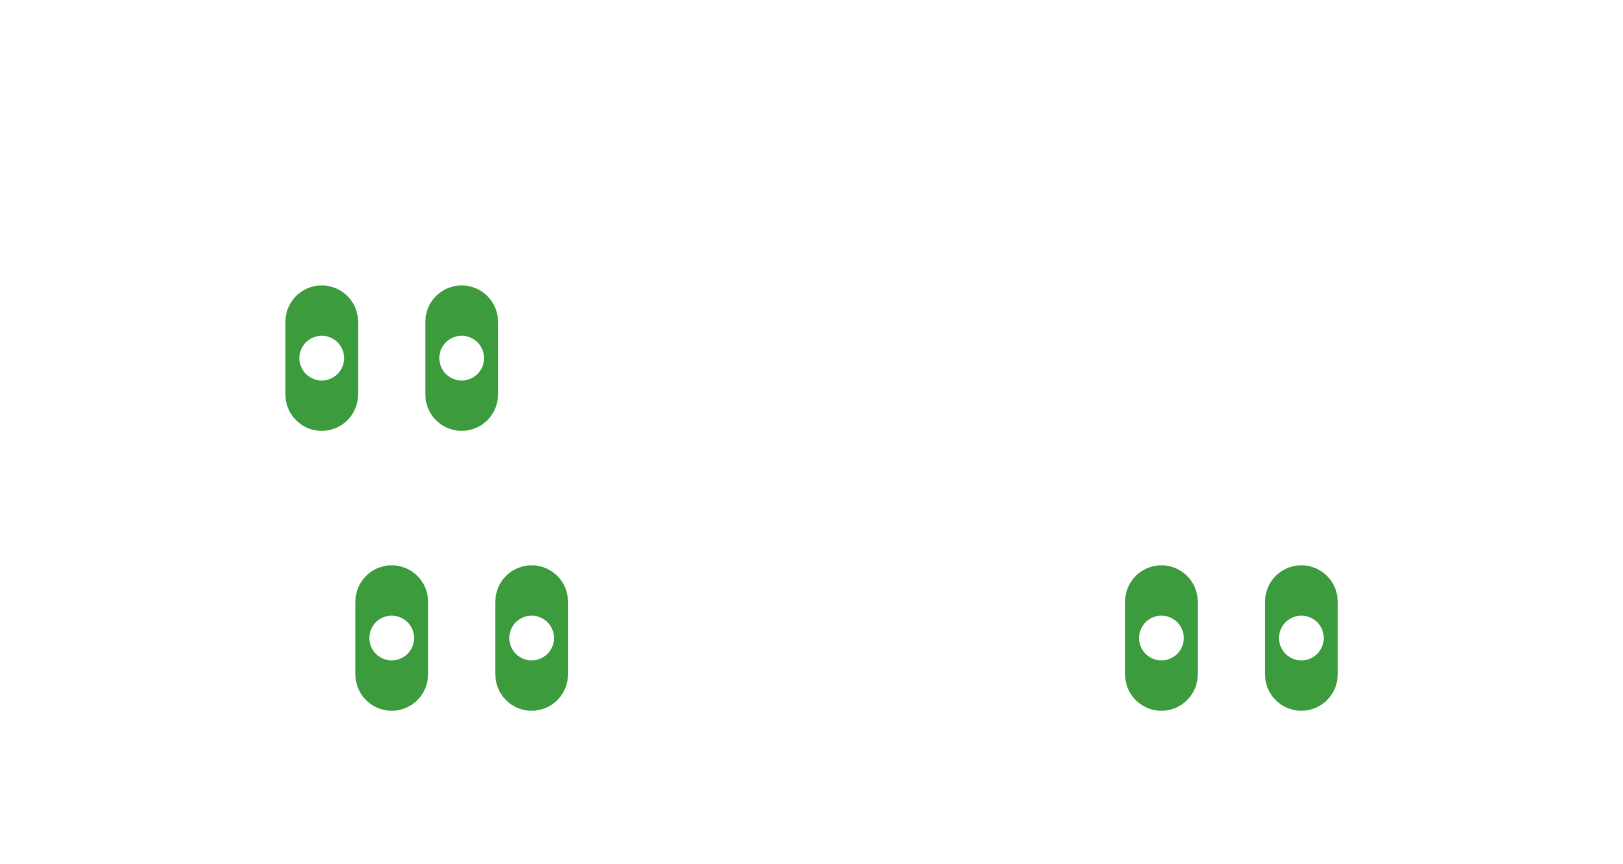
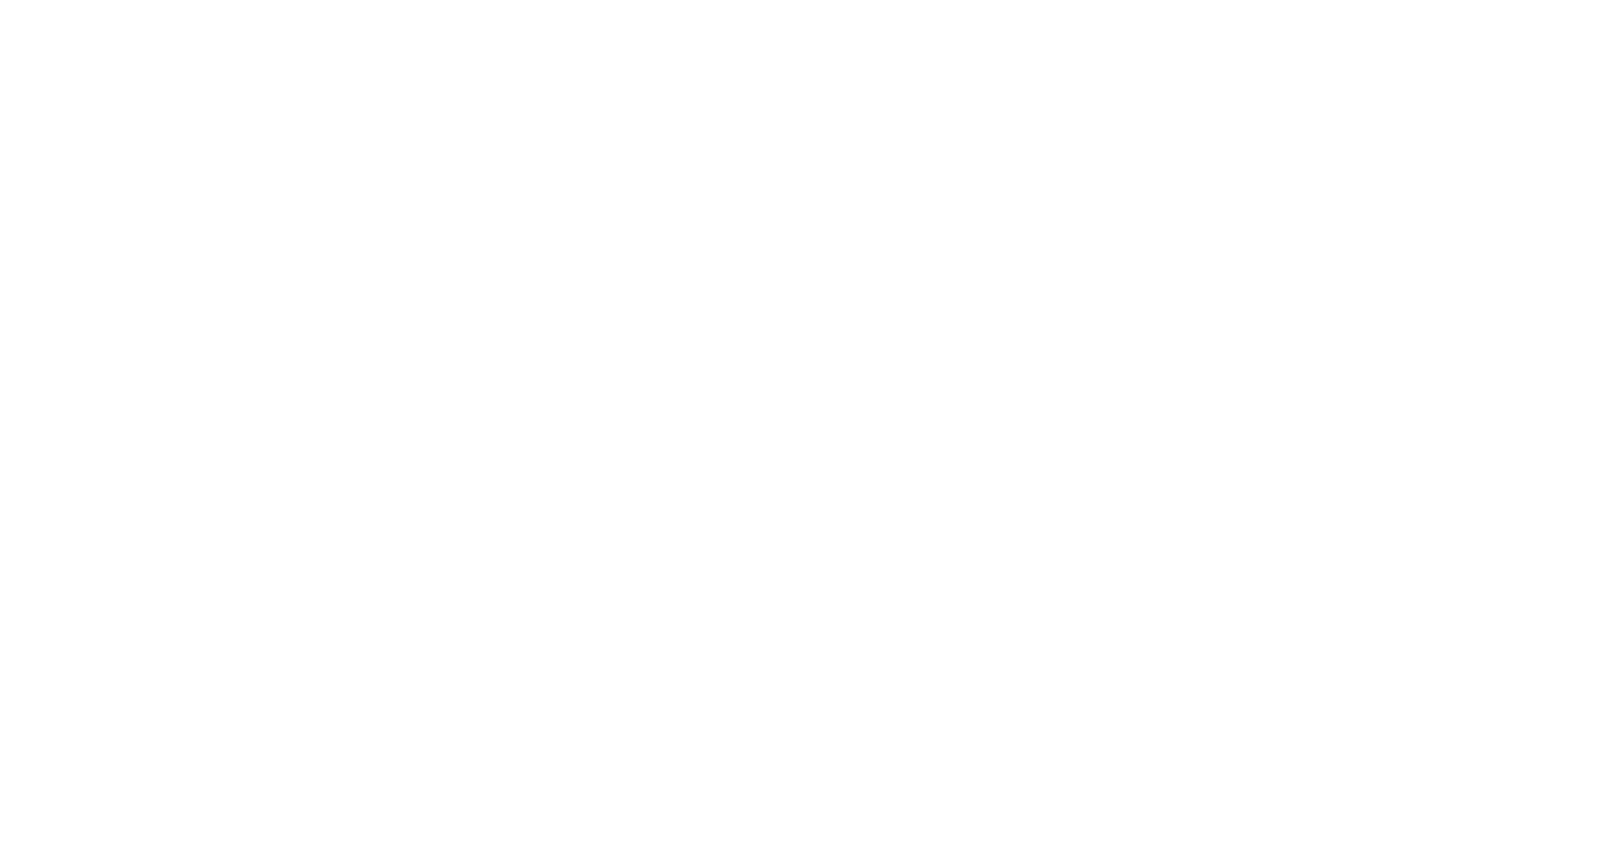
part: (391, 358) -> none
part: (461, 638) -> none
part: (1231, 638) -> none

